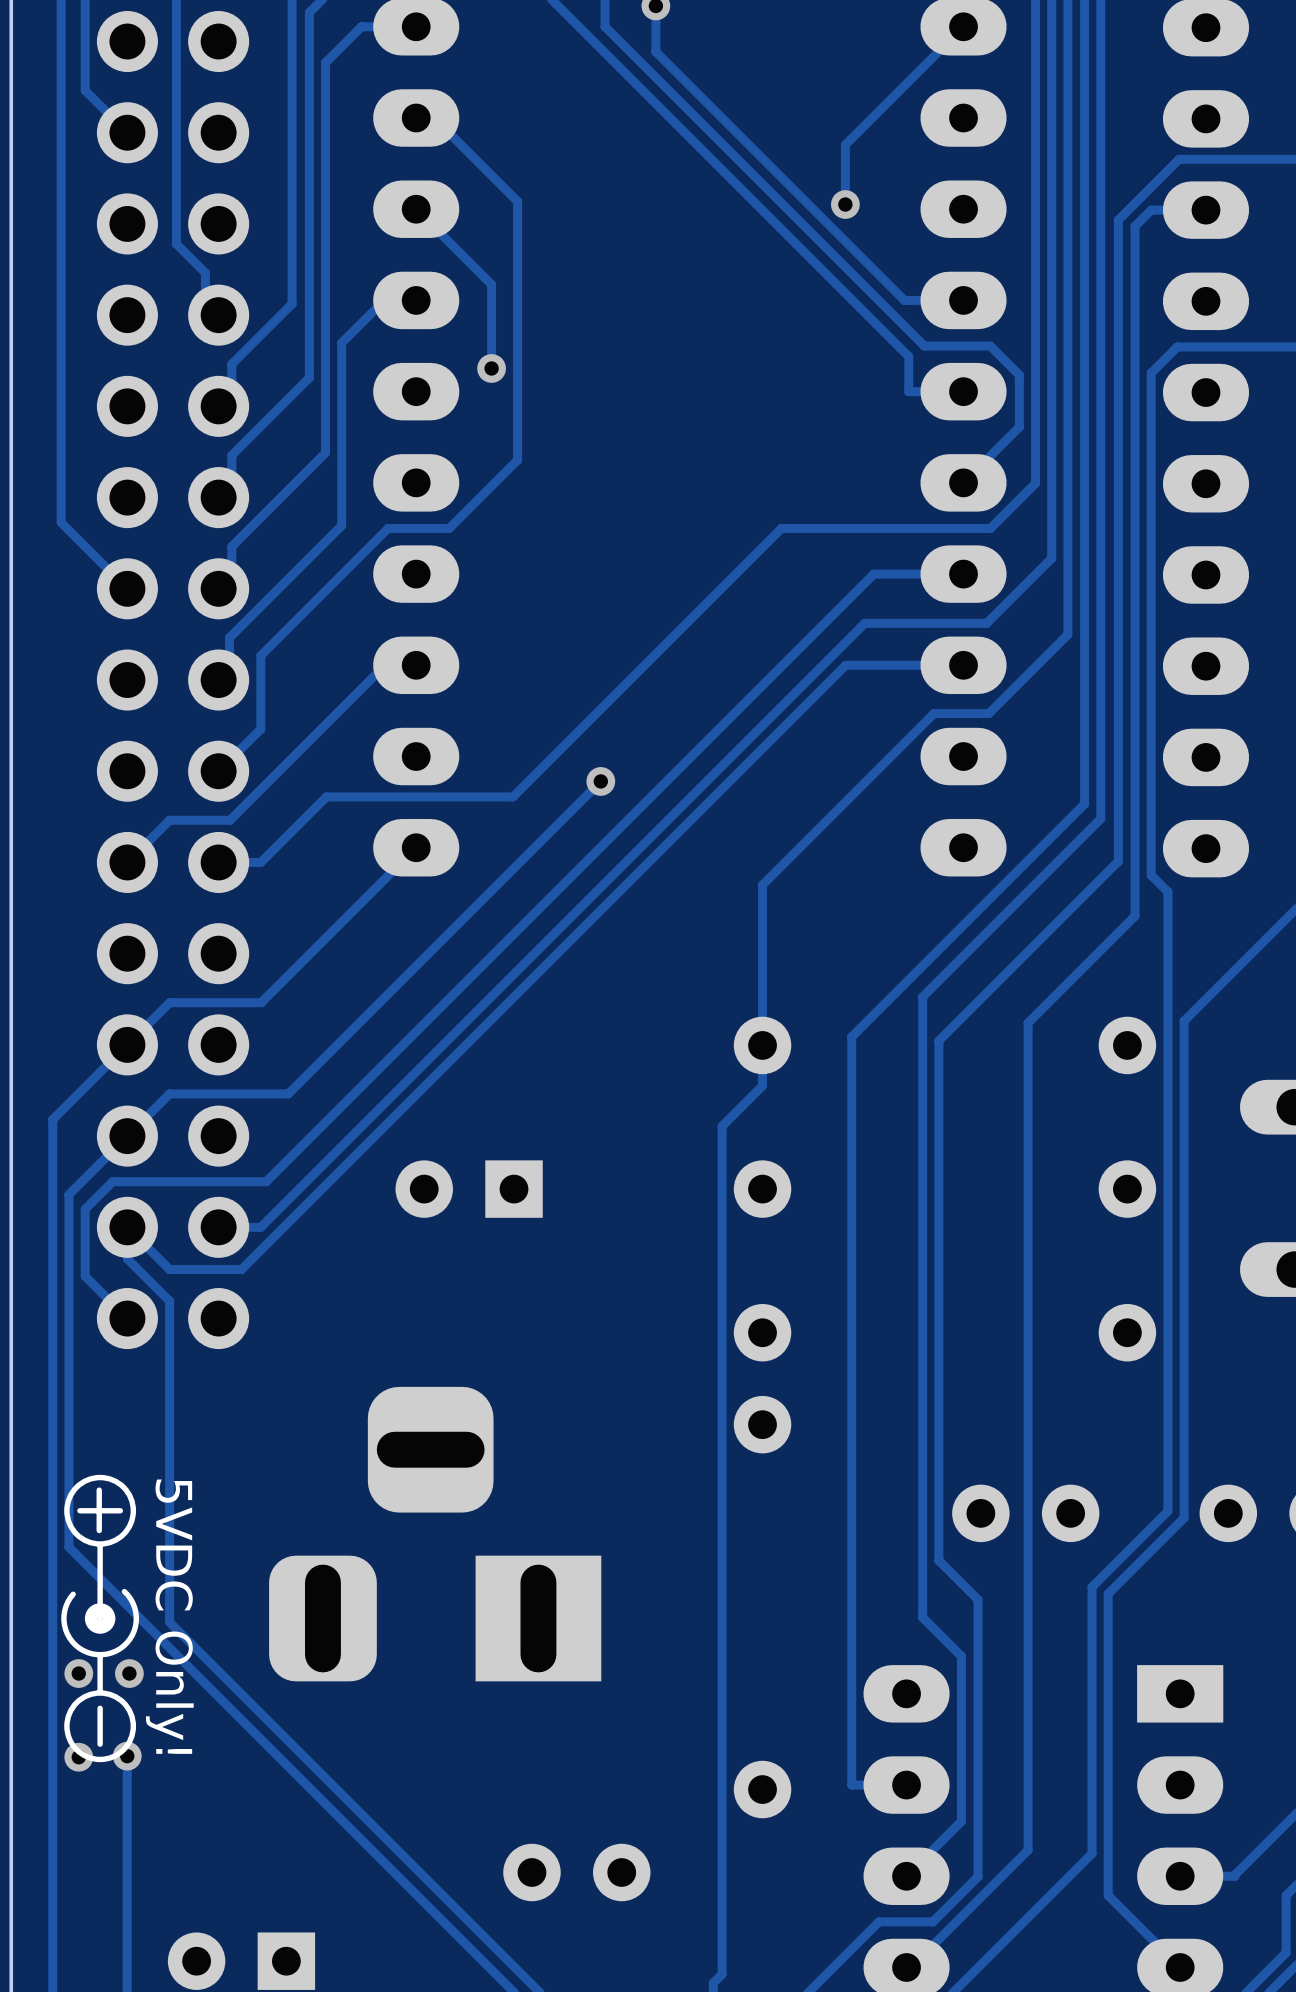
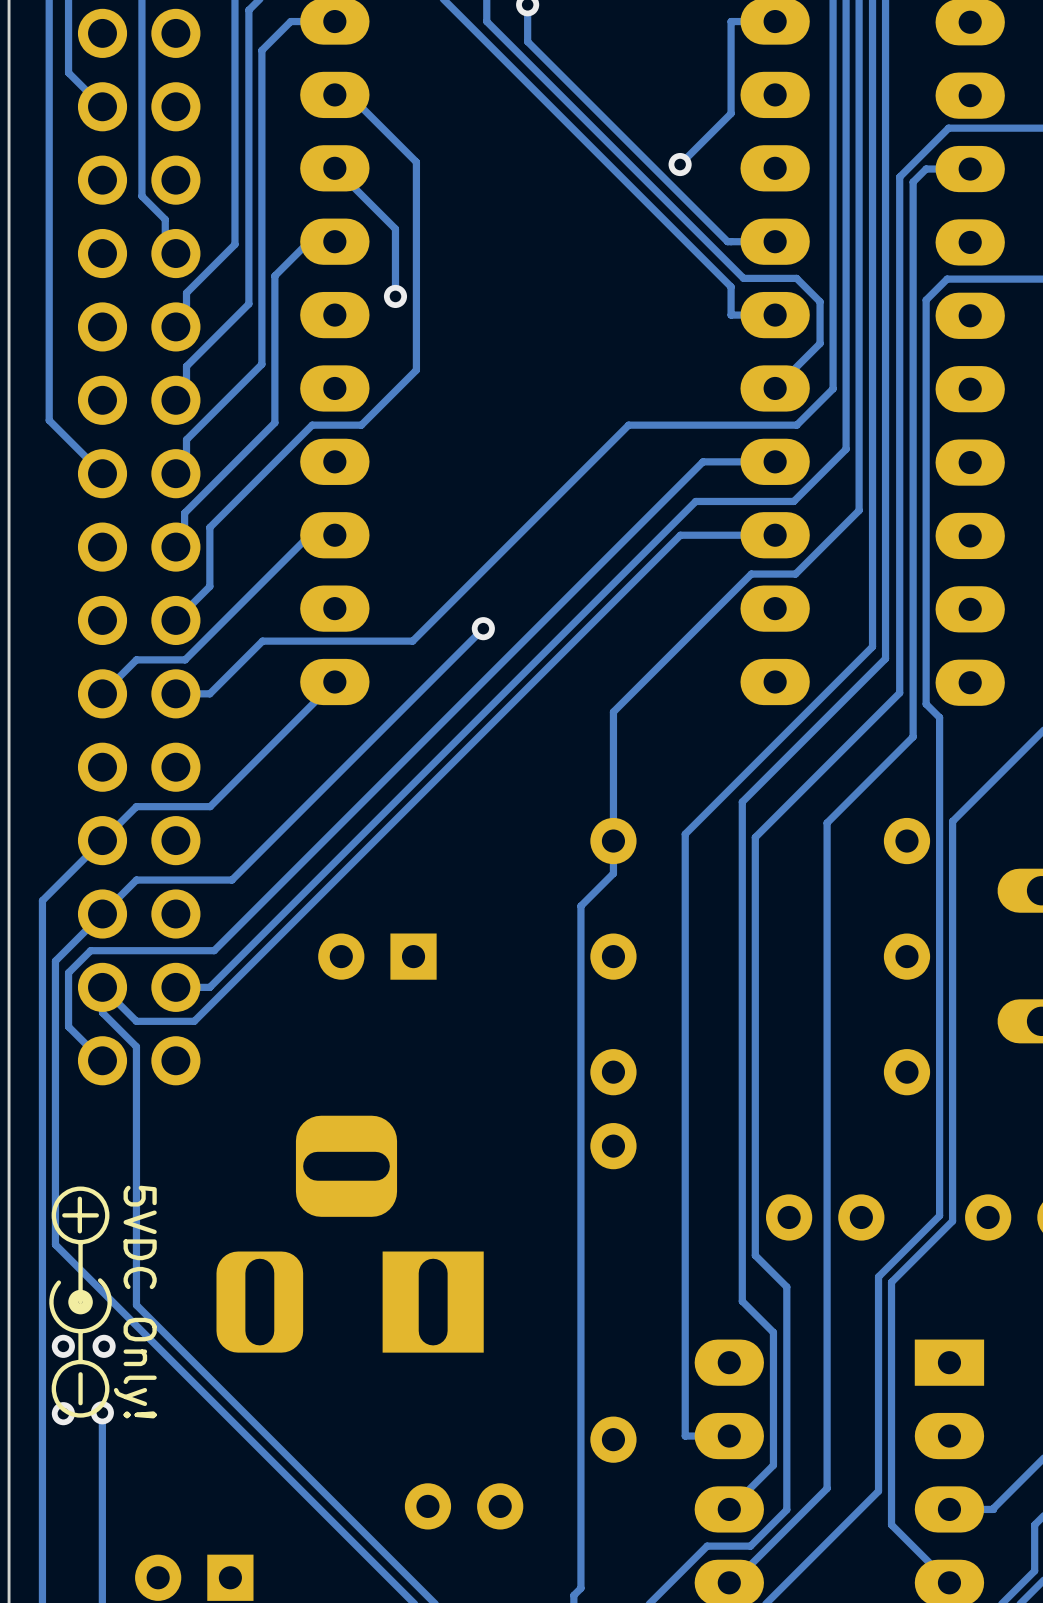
track: (963, 26) (845, 144) (845, 204) -> (775, 21) (731, 21) (731, 113) (680, 164)

